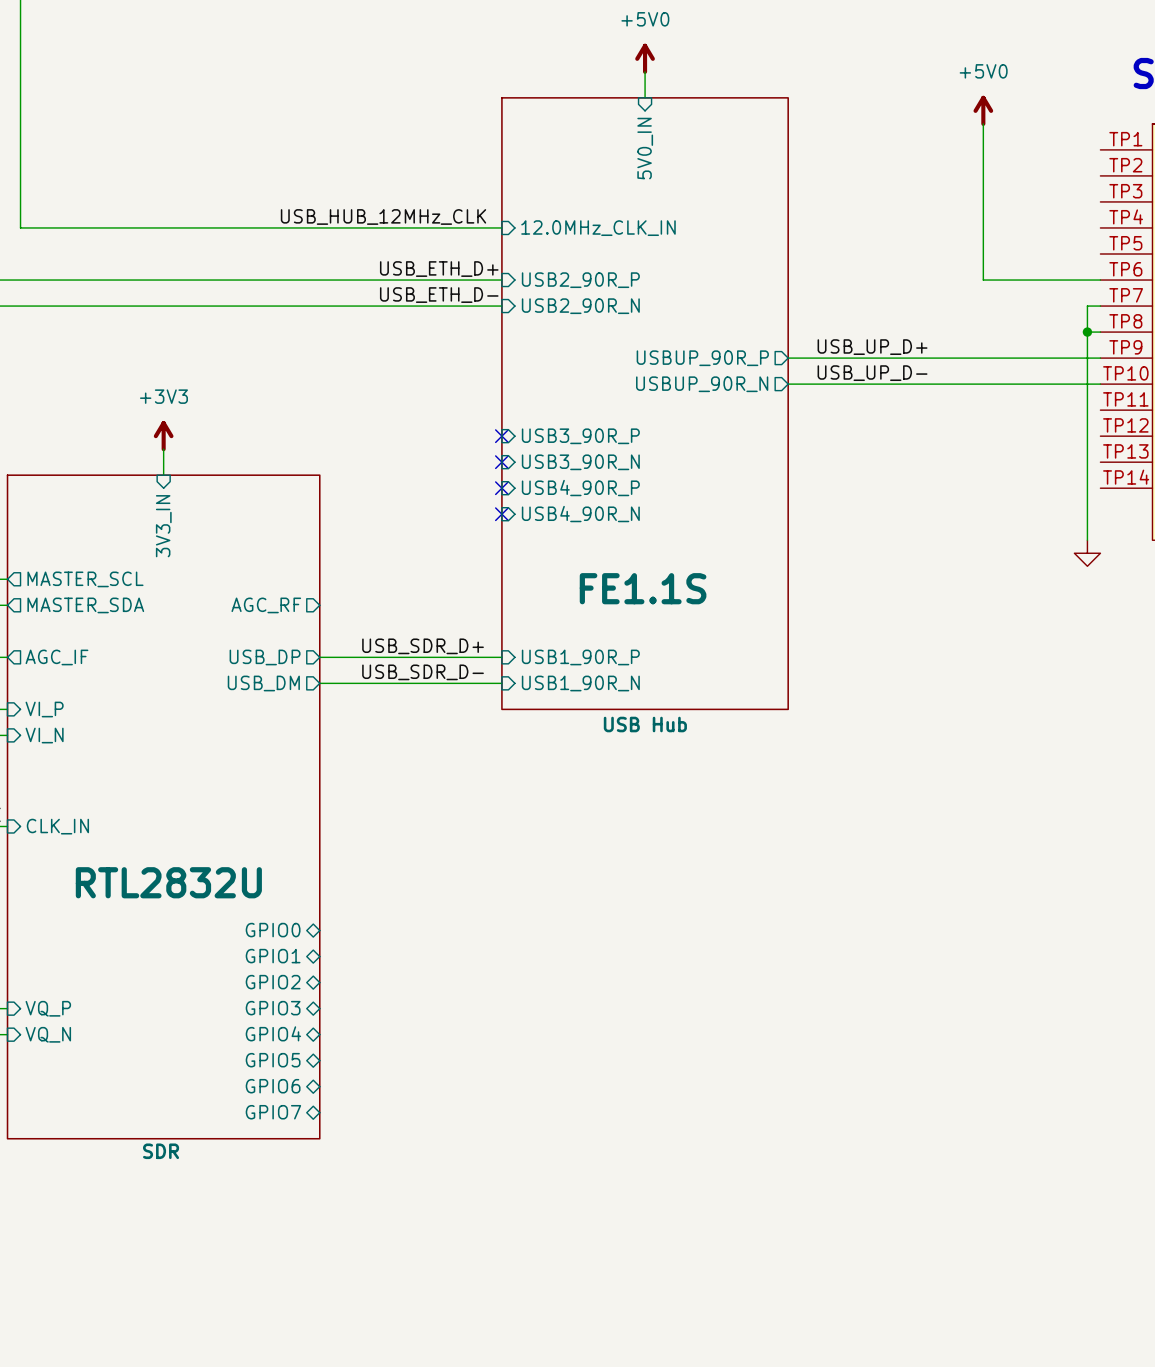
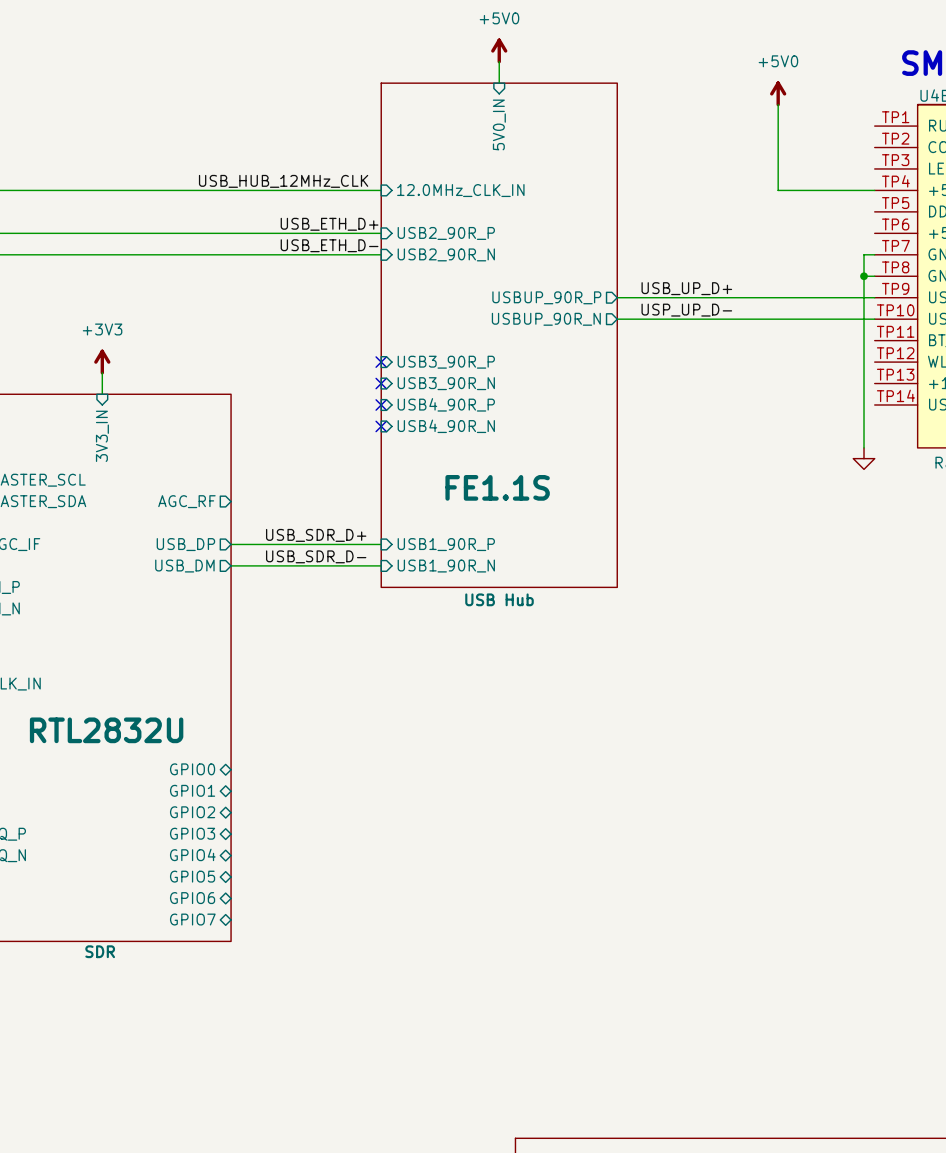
wire: (983, 227) (983, 280) (1100, 280) -> (778, 190) (874, 190)
label: USB_UP_D- (872, 373) -> USP_UP_D- (686, 310)

